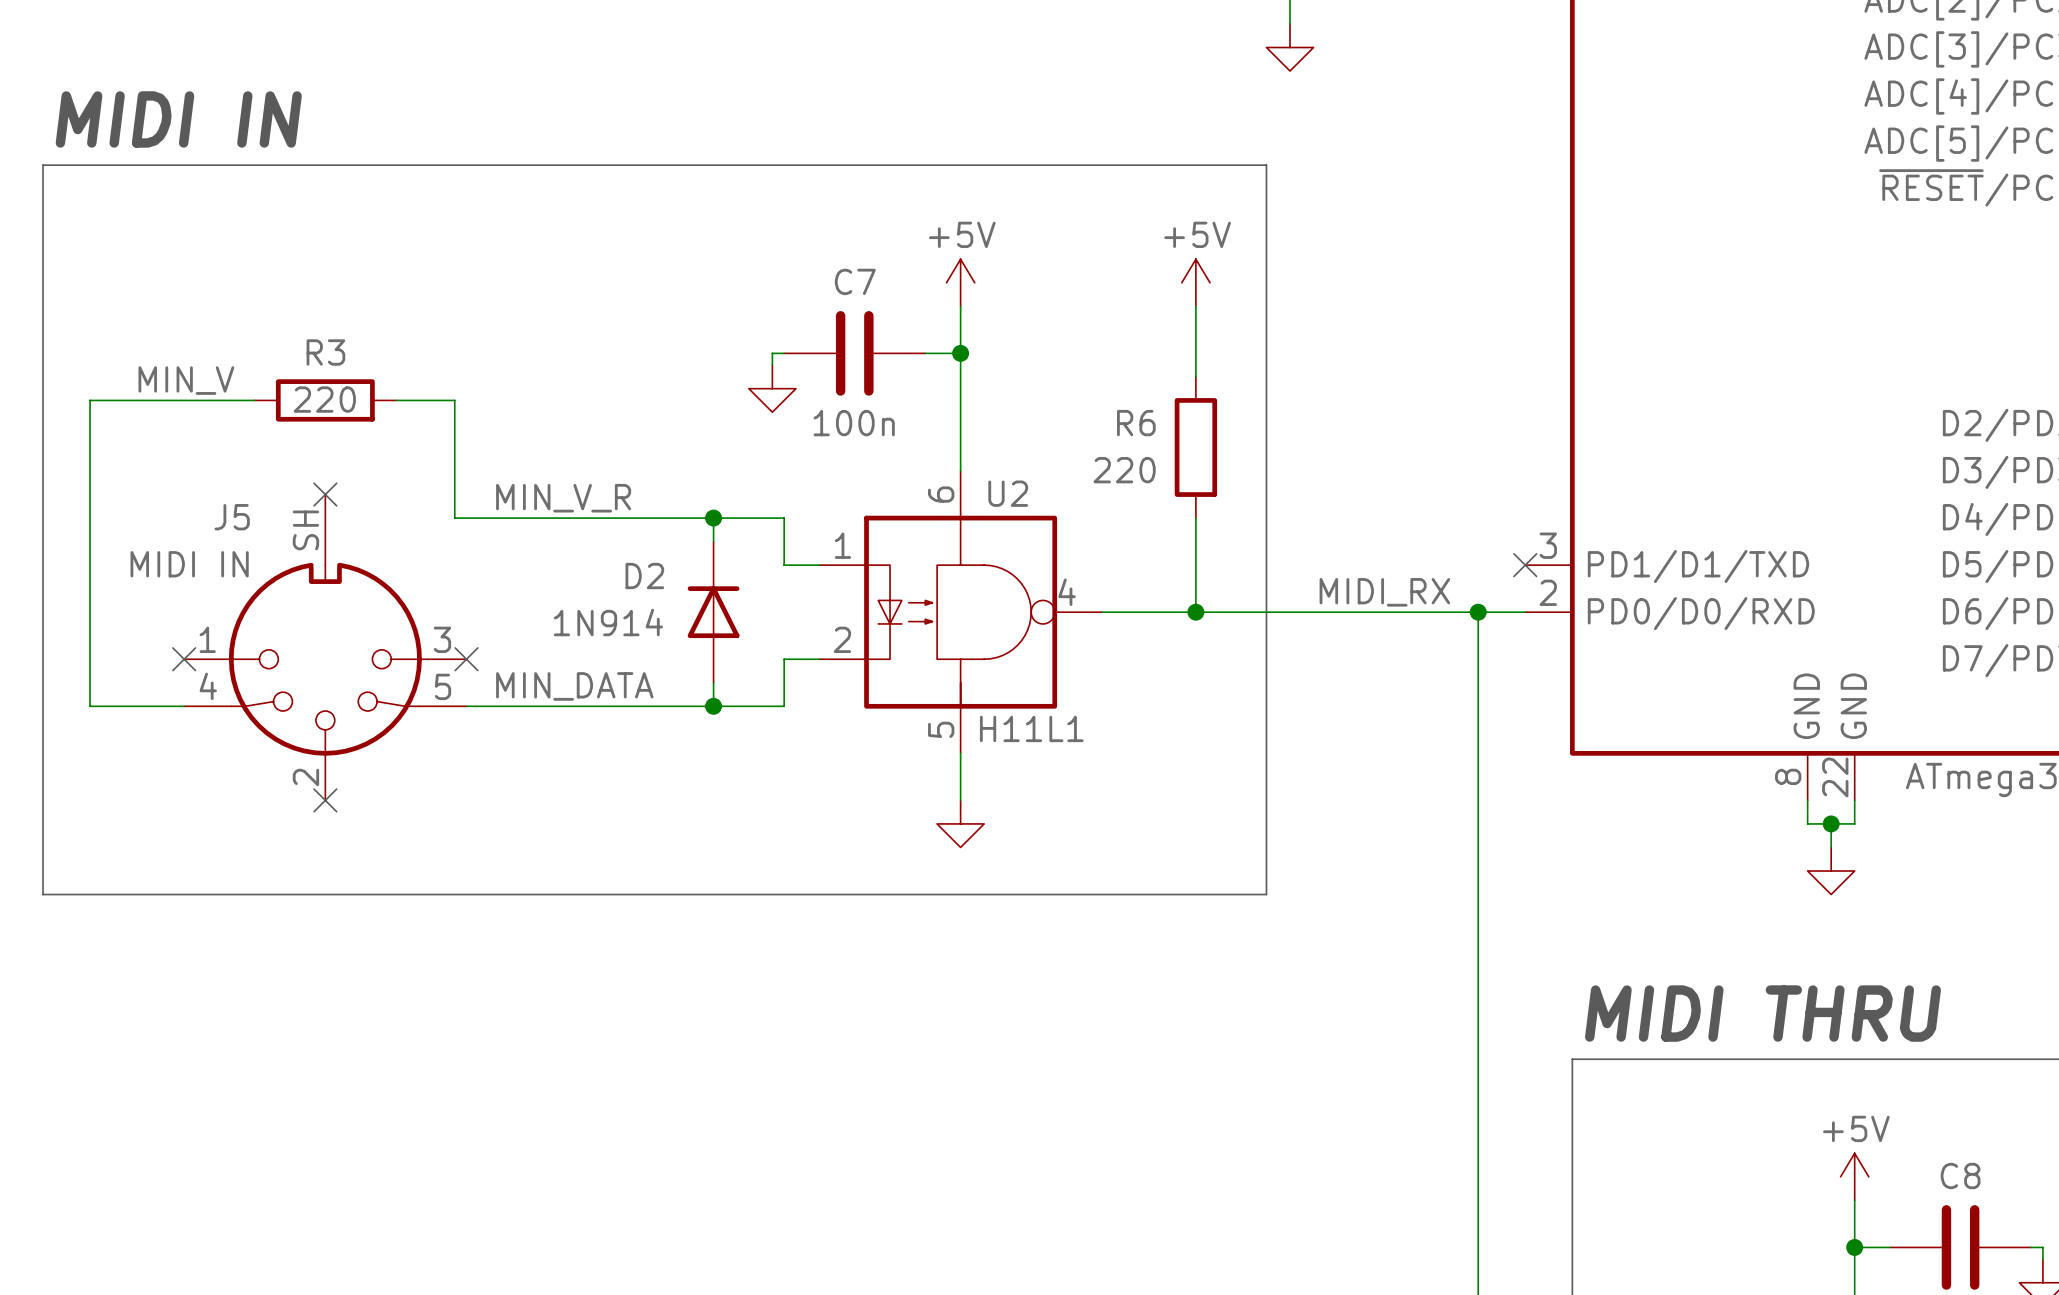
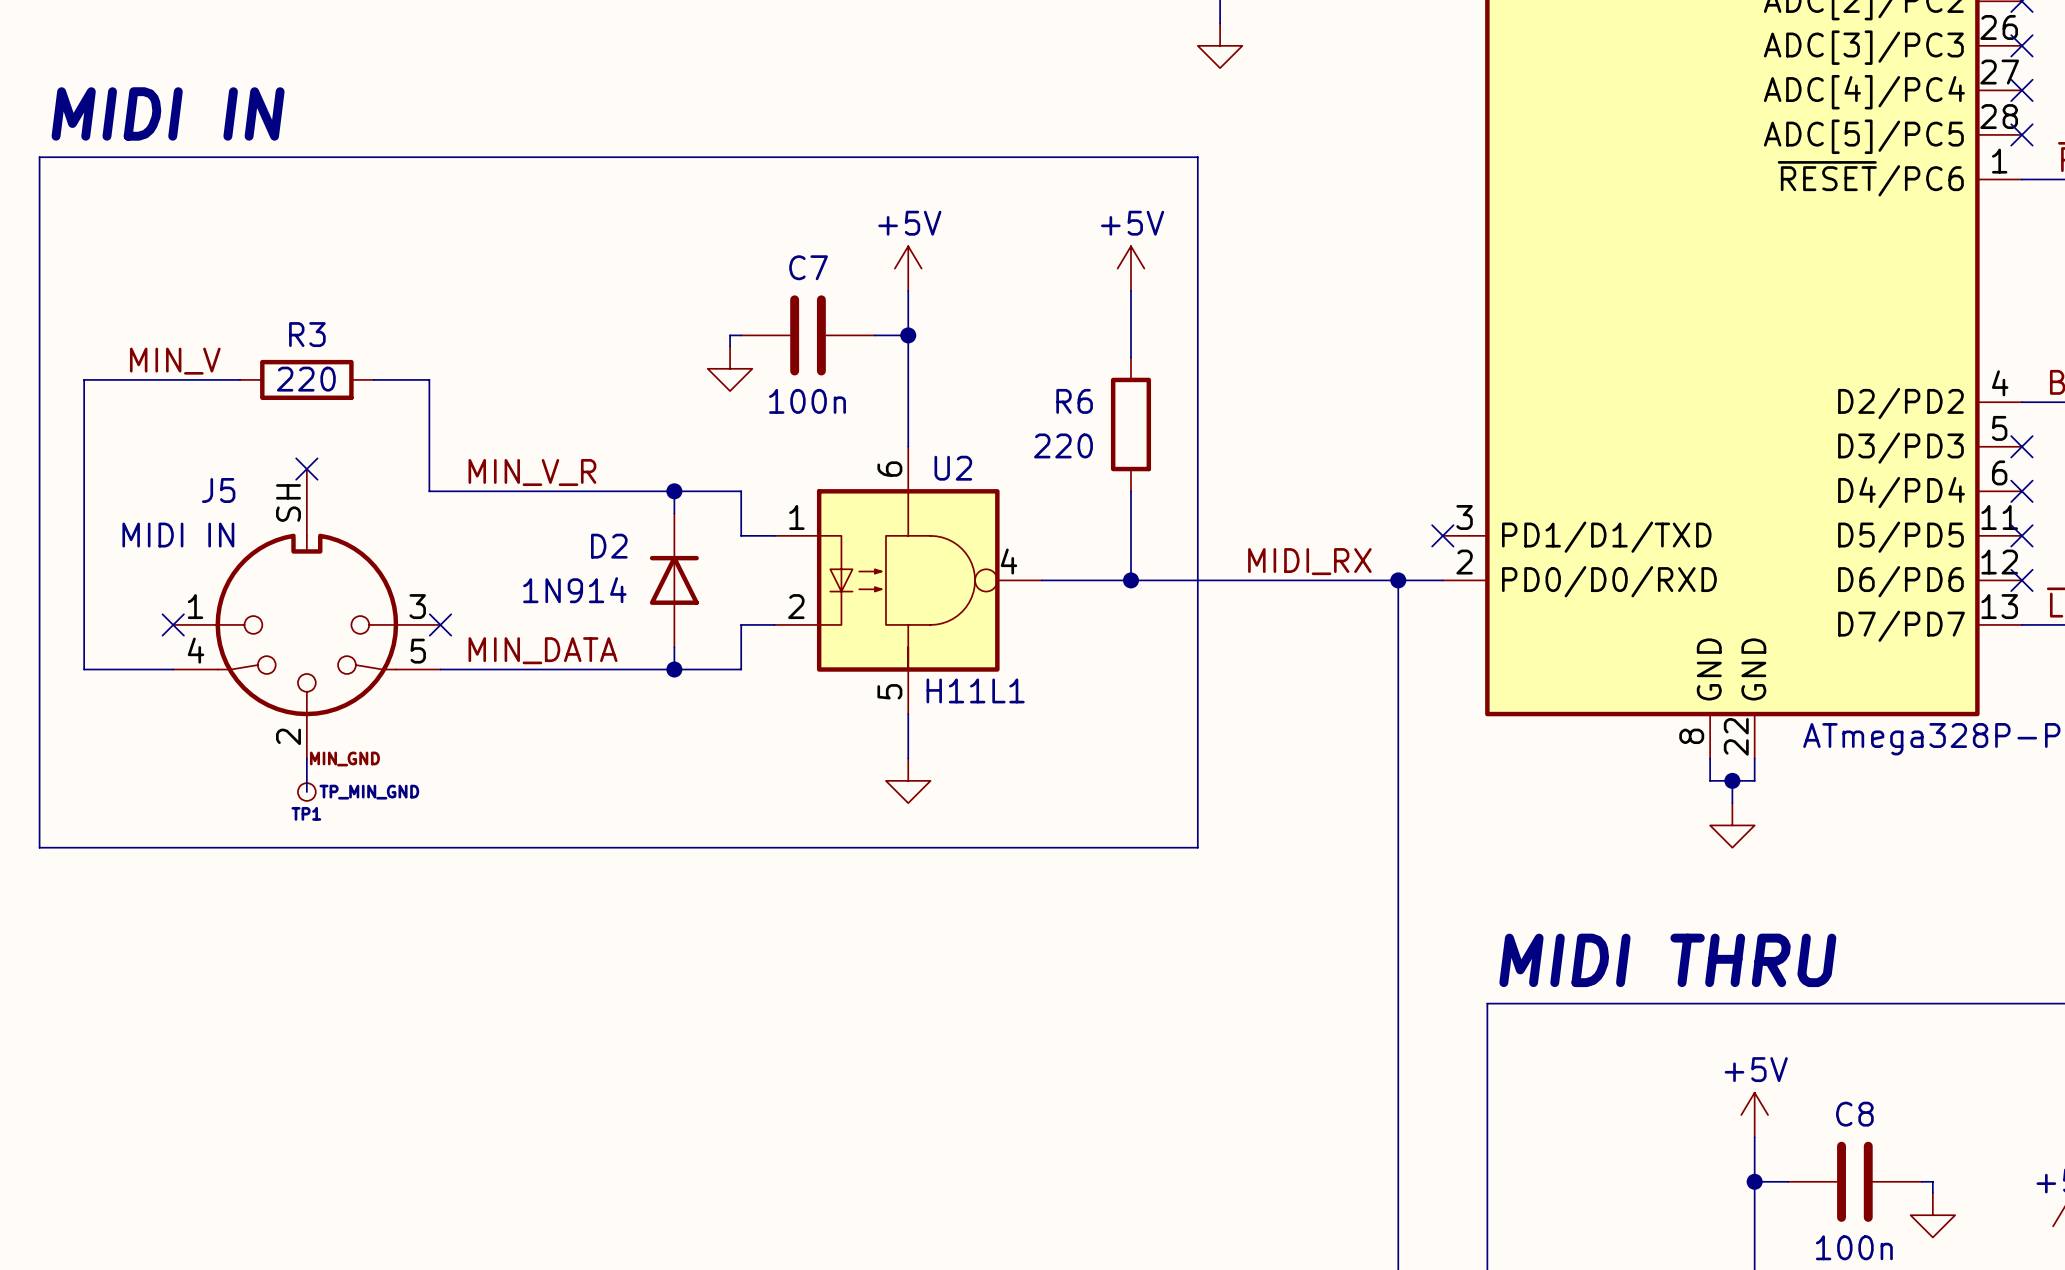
wire: none -> (306, 758) (306, 792)
no-connect mark: (325, 800) -> none
label: none -> MIN_GND (344, 758)
TP1: none -> TP_MIN_GND (306, 792)

